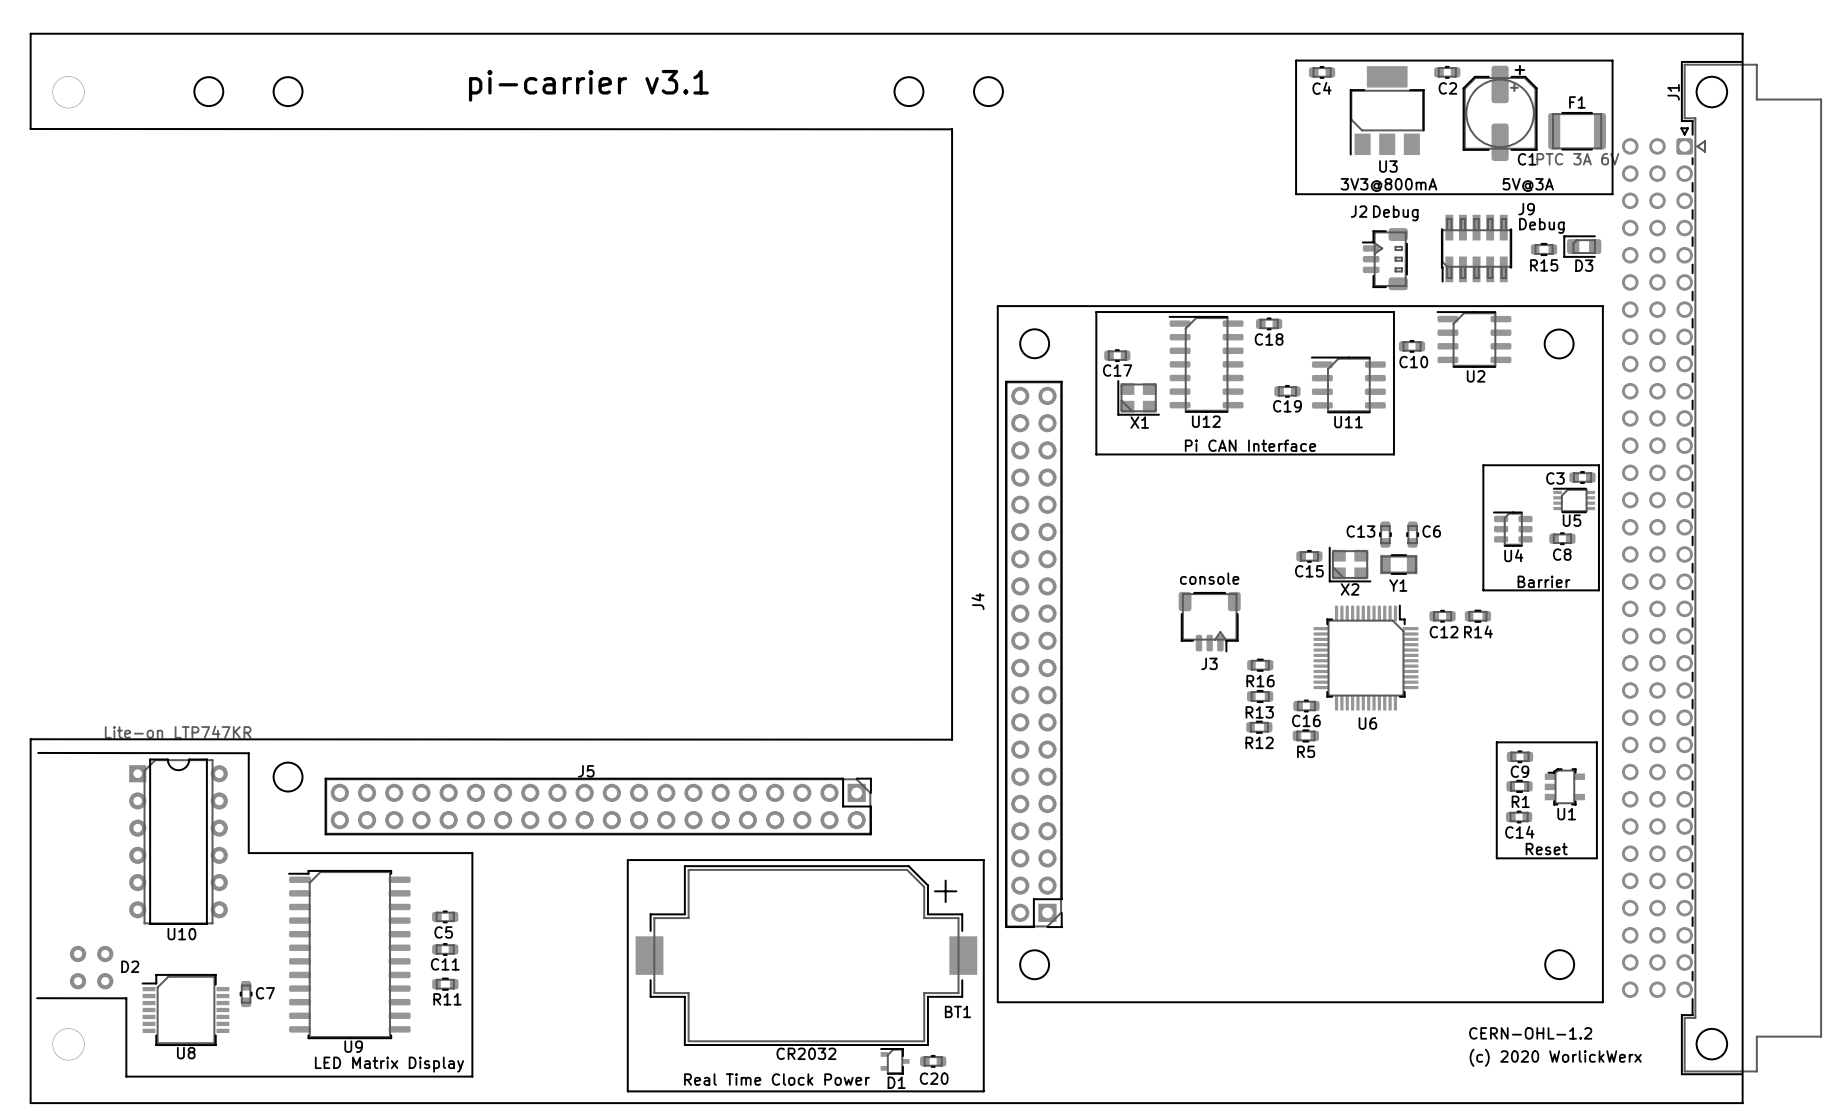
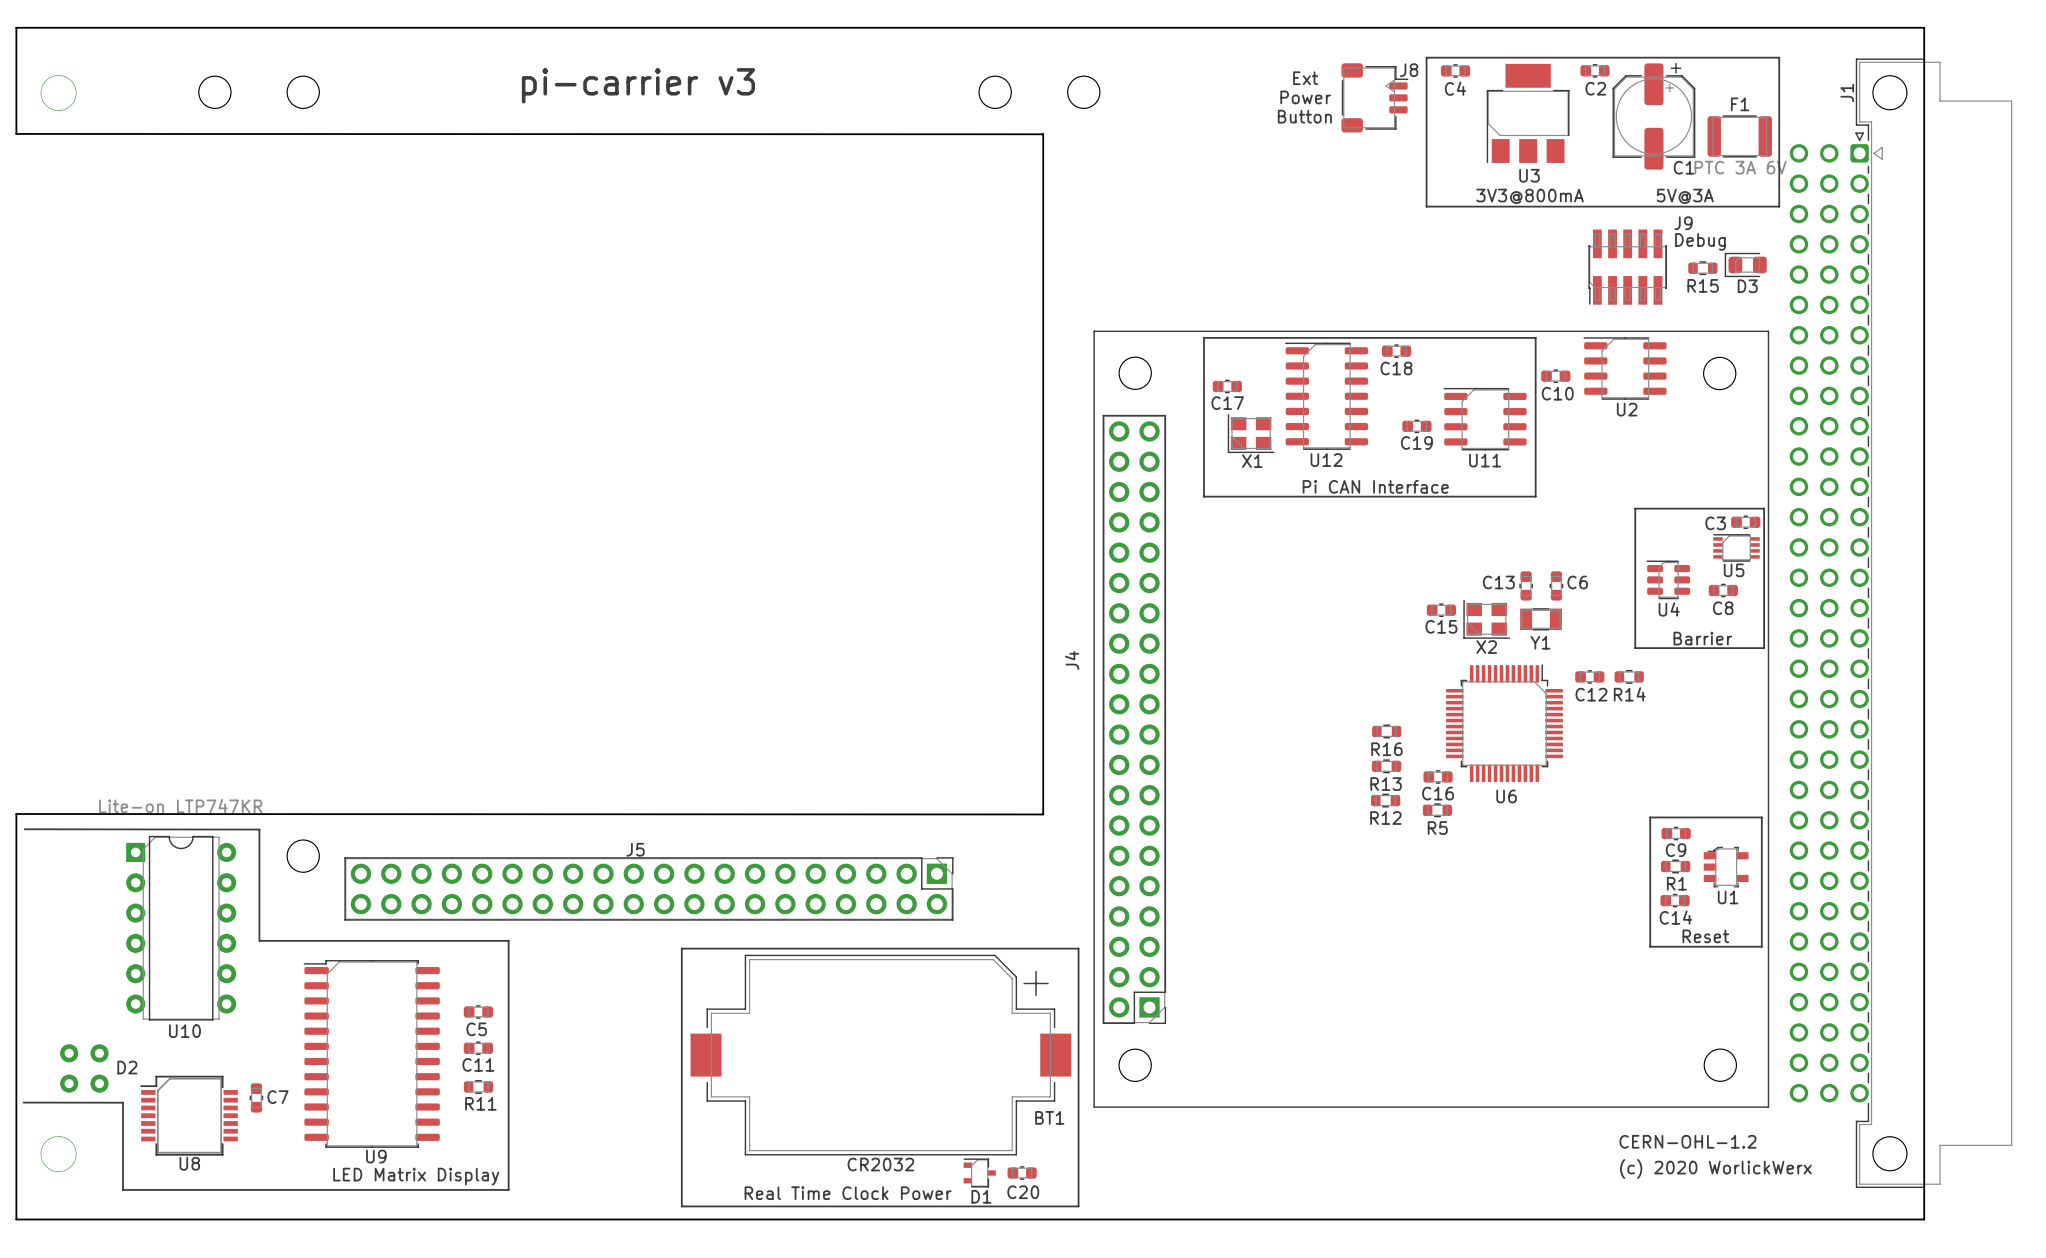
text: none -> Ext (1305, 78)
text: pi-carrier v3.1 (588, 85) -> pi-carrier v3 (638, 85)
text: none -> Power (1305, 97)
J8: none -> (1374, 97)
text: none -> Button (1304, 116)
J2: Debug (1385, 259) -> none
J3: console (1209, 621) -> none

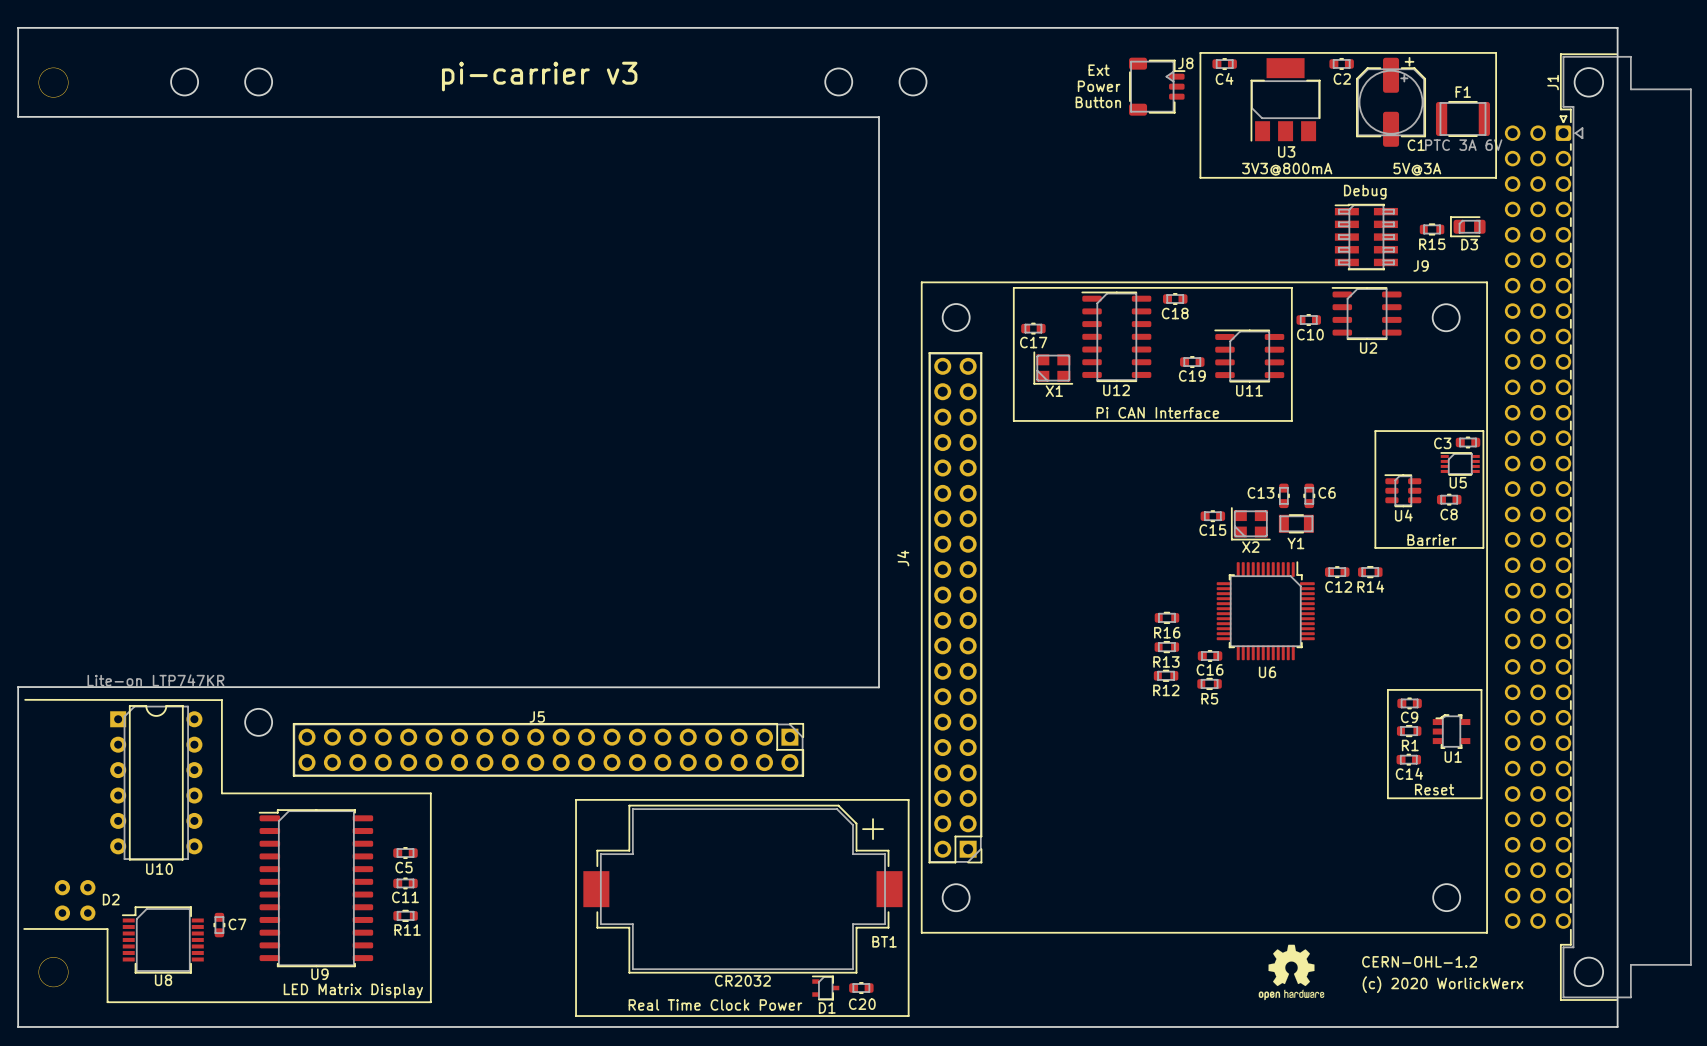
J9 name position: J9 (1683, 223) -> J9 (1421, 265)
text position: Debug (1700, 241) -> Debug (1365, 192)
J9 rotation: 0° (1627, 267) -> 90° clockwise (1366, 237)
drawing: none -> [1258, 944, 1325, 1001]

